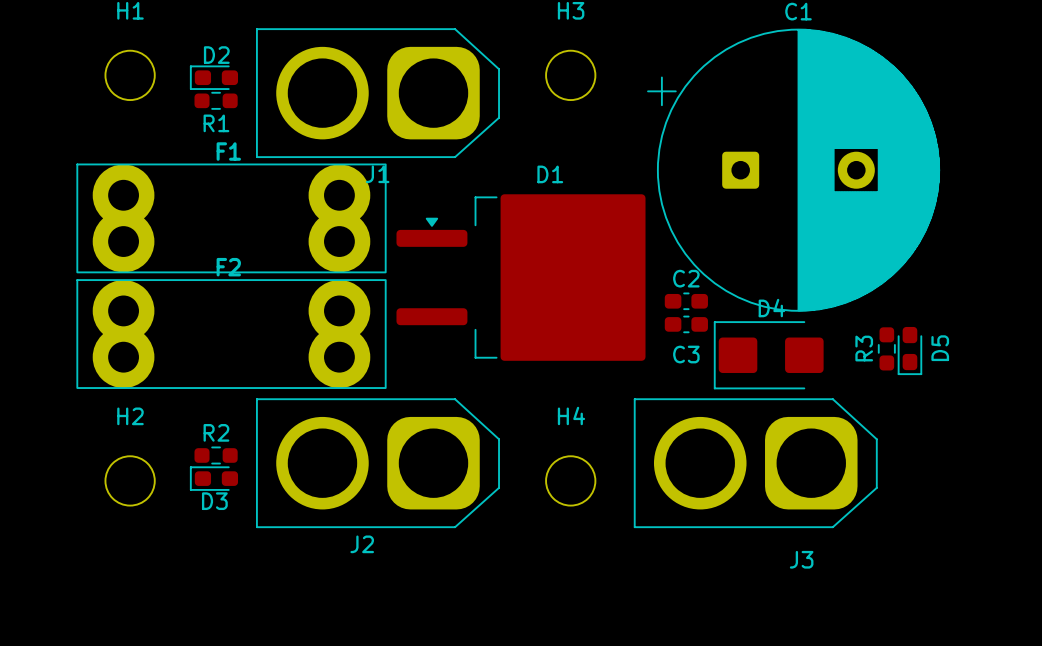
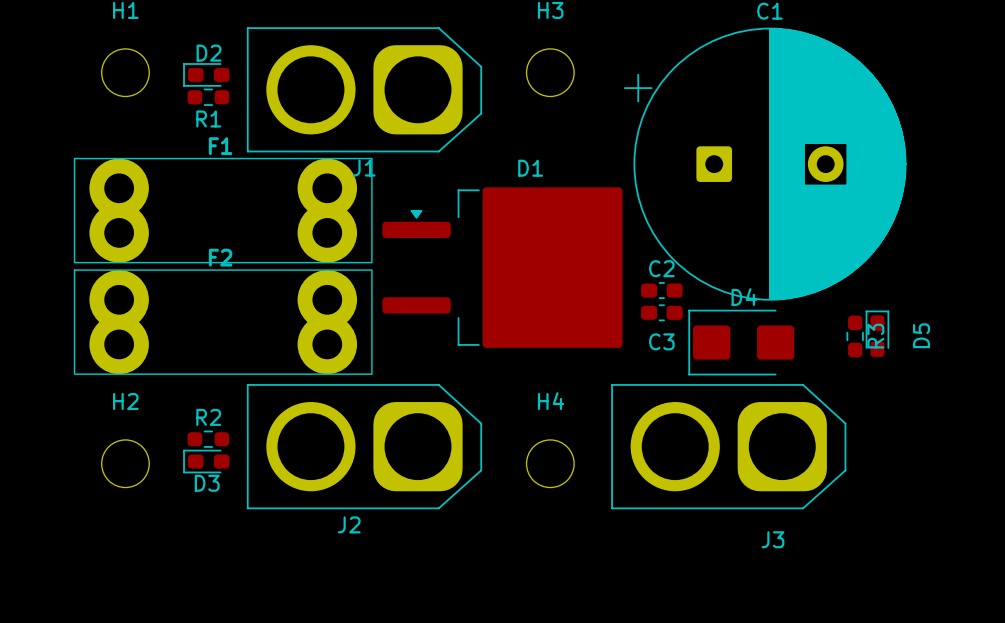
R3 name position: R3 (864, 348) -> R3 (875, 336)
D5 rotation: 0° (909, 351) -> 180° (877, 333)

